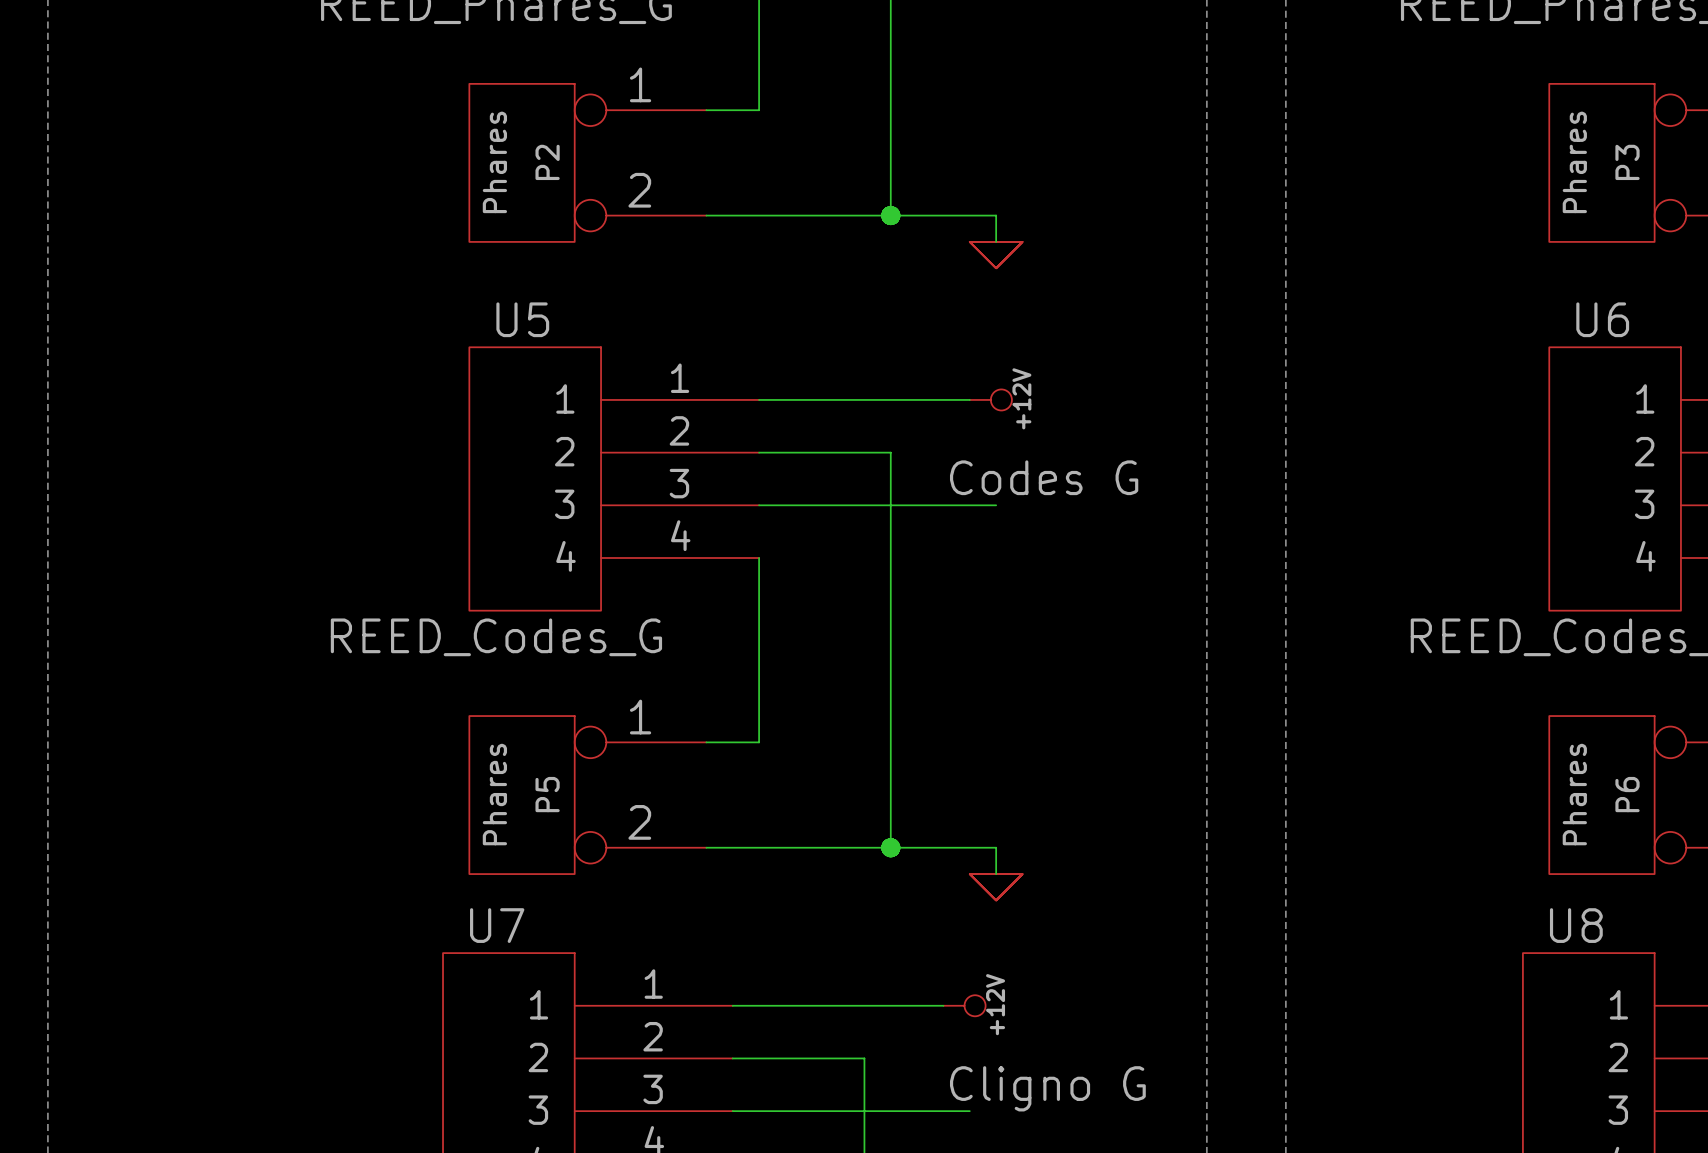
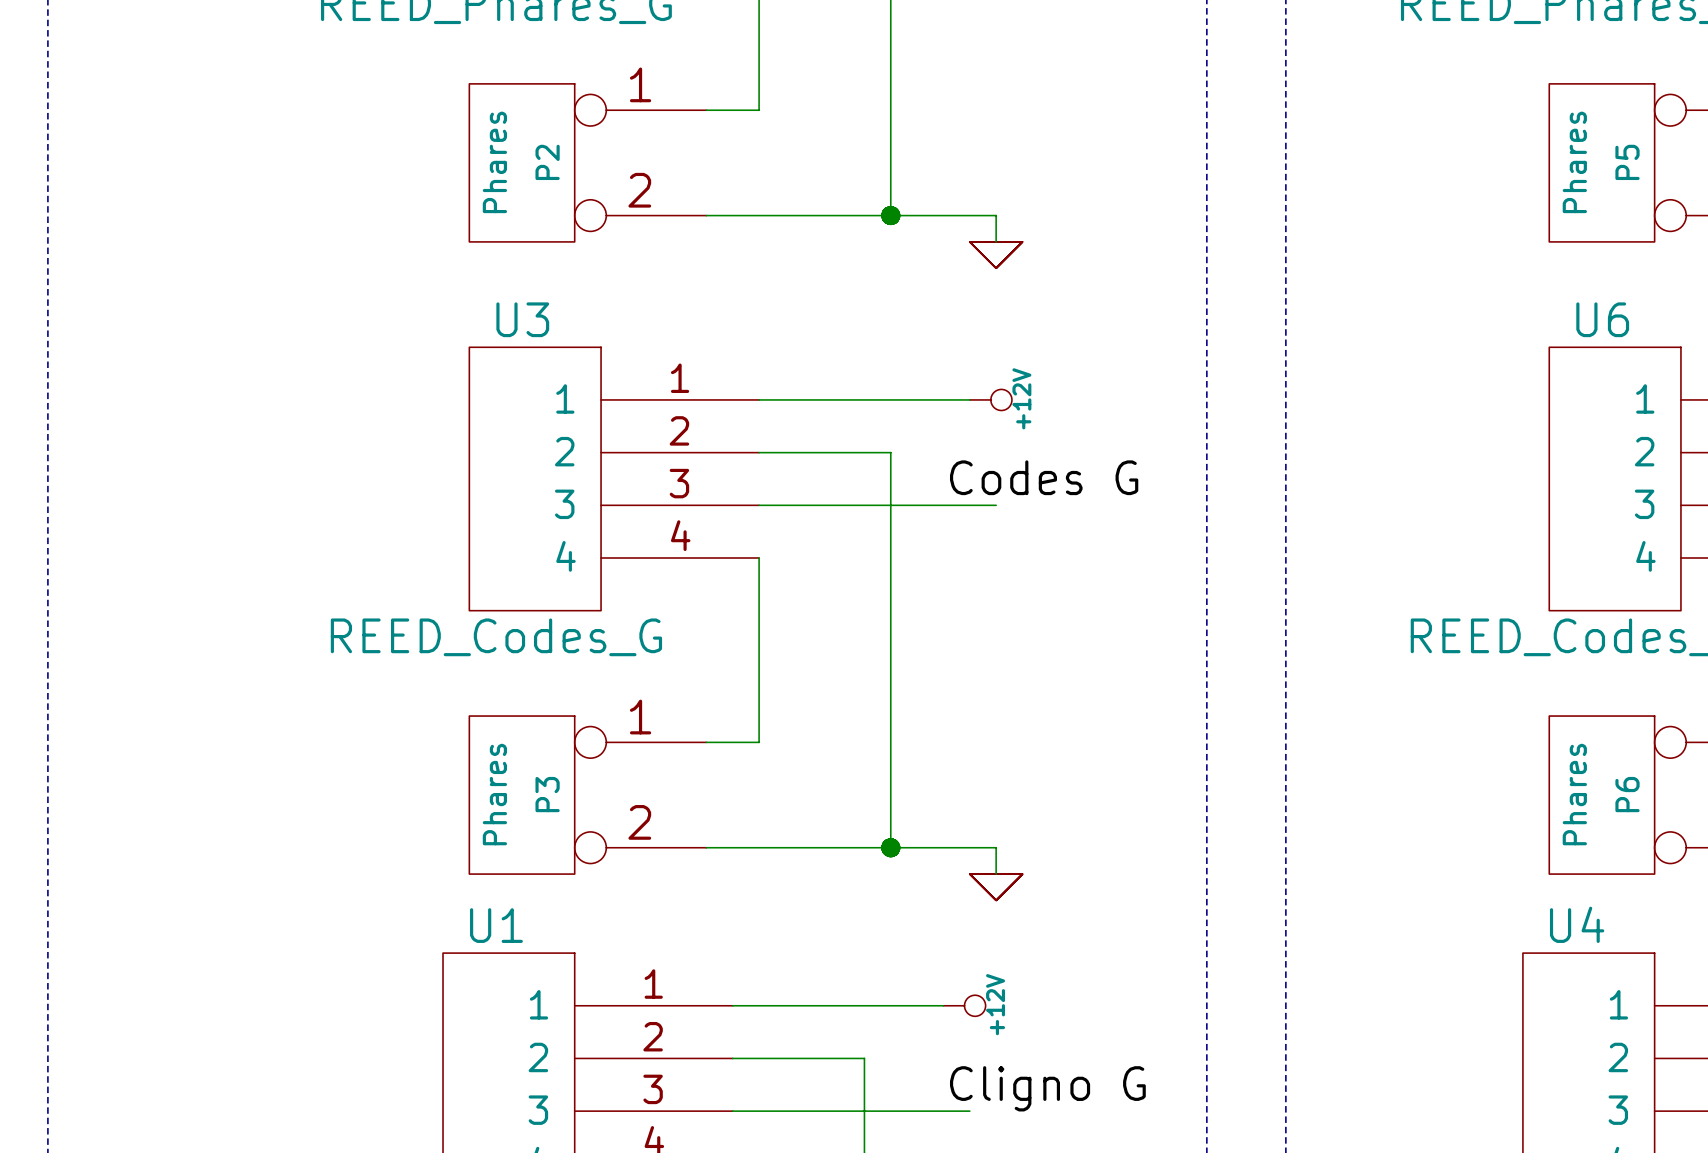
P3 name: P3 (1627, 162) -> P5 (1627, 162)
U5 name: U5 (522, 319) -> U3 (522, 319)
P5 name: P5 (547, 794) -> P3 (547, 794)
U7 name: U7 (497, 925) -> U1 (496, 925)
U8 name: U8 (1576, 925) -> U4 (1577, 924)

